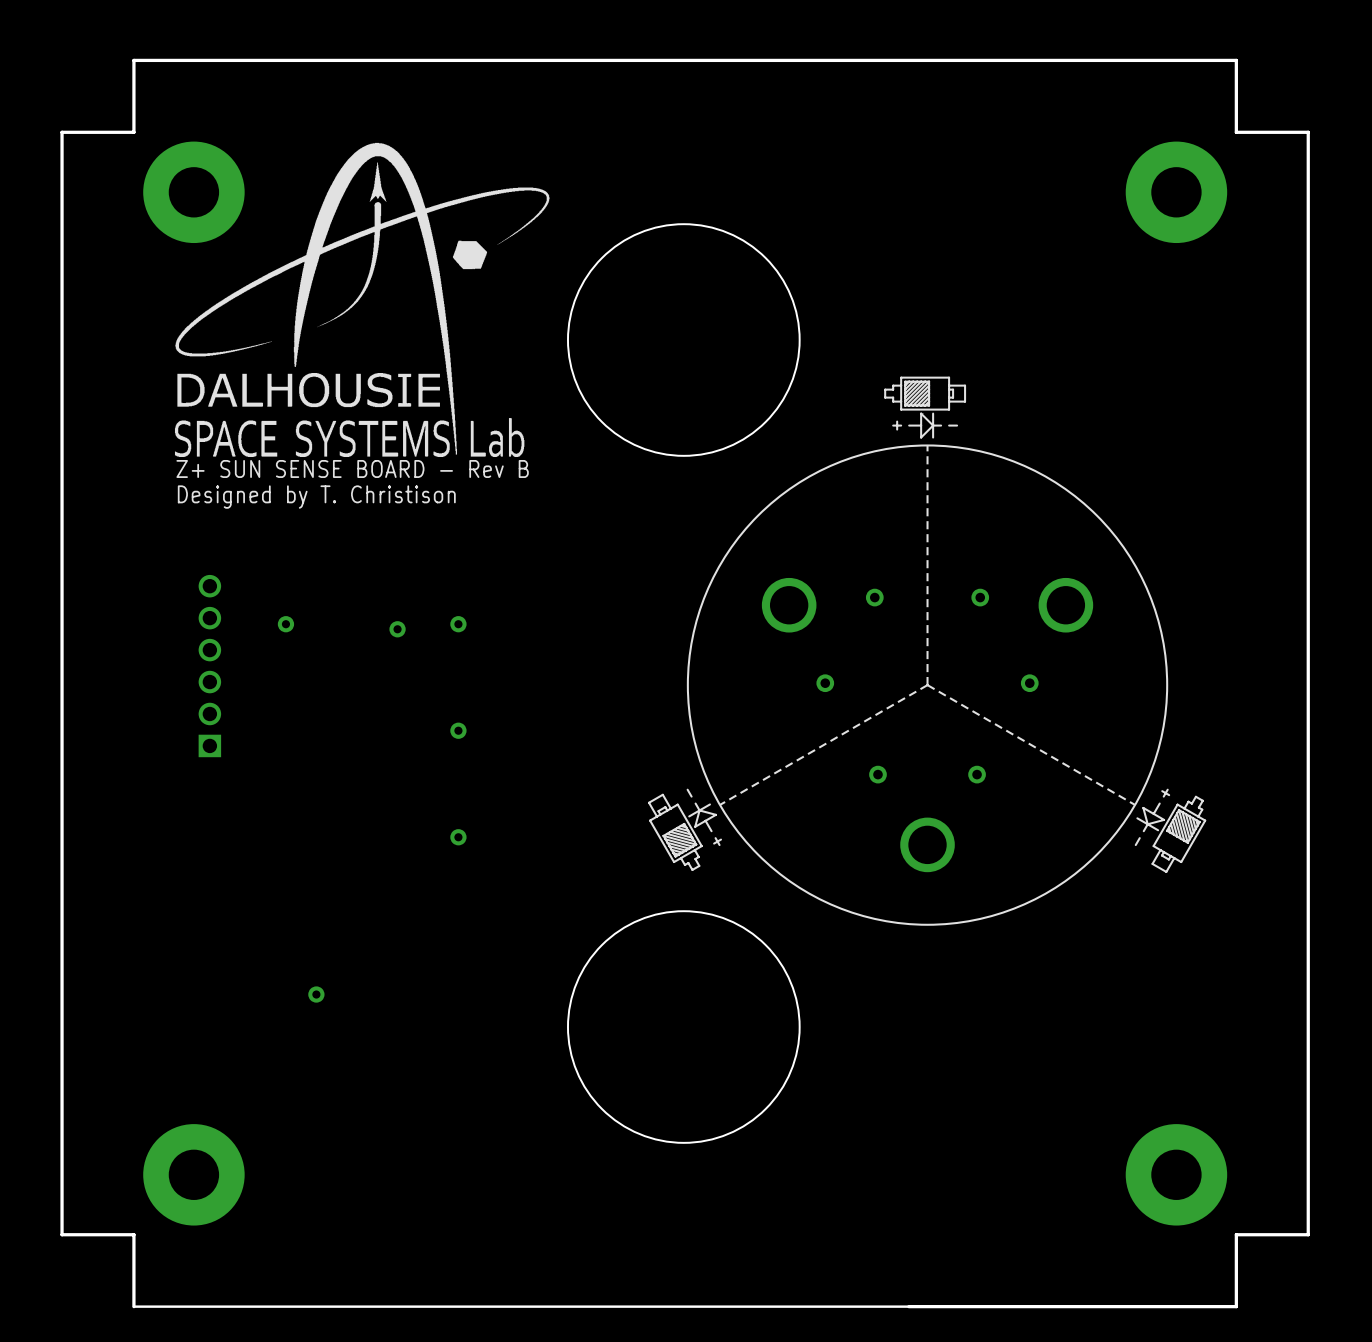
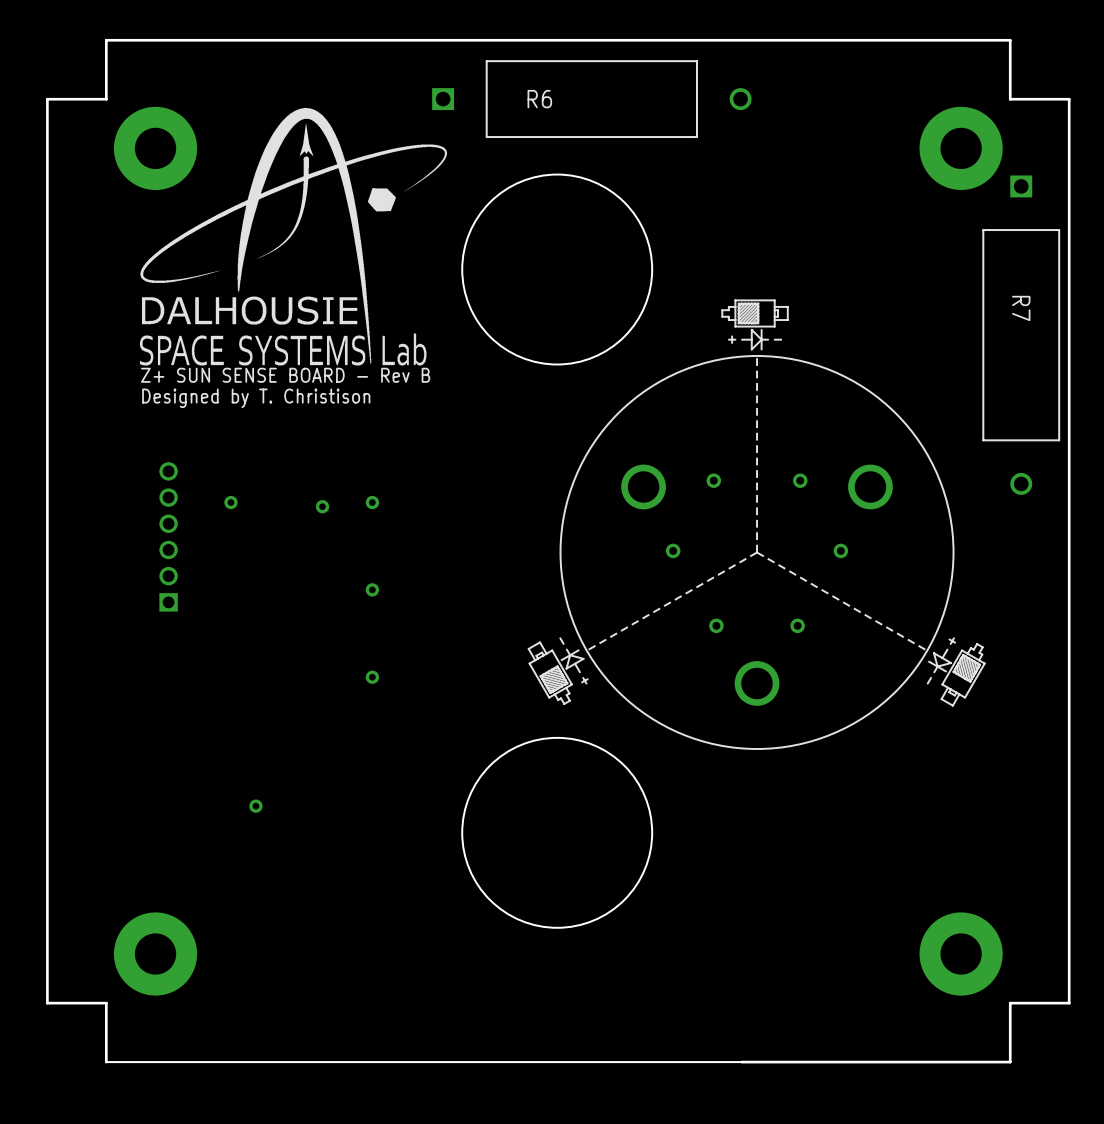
R6: none -> (591, 99)
R7: none -> (1021, 335)

